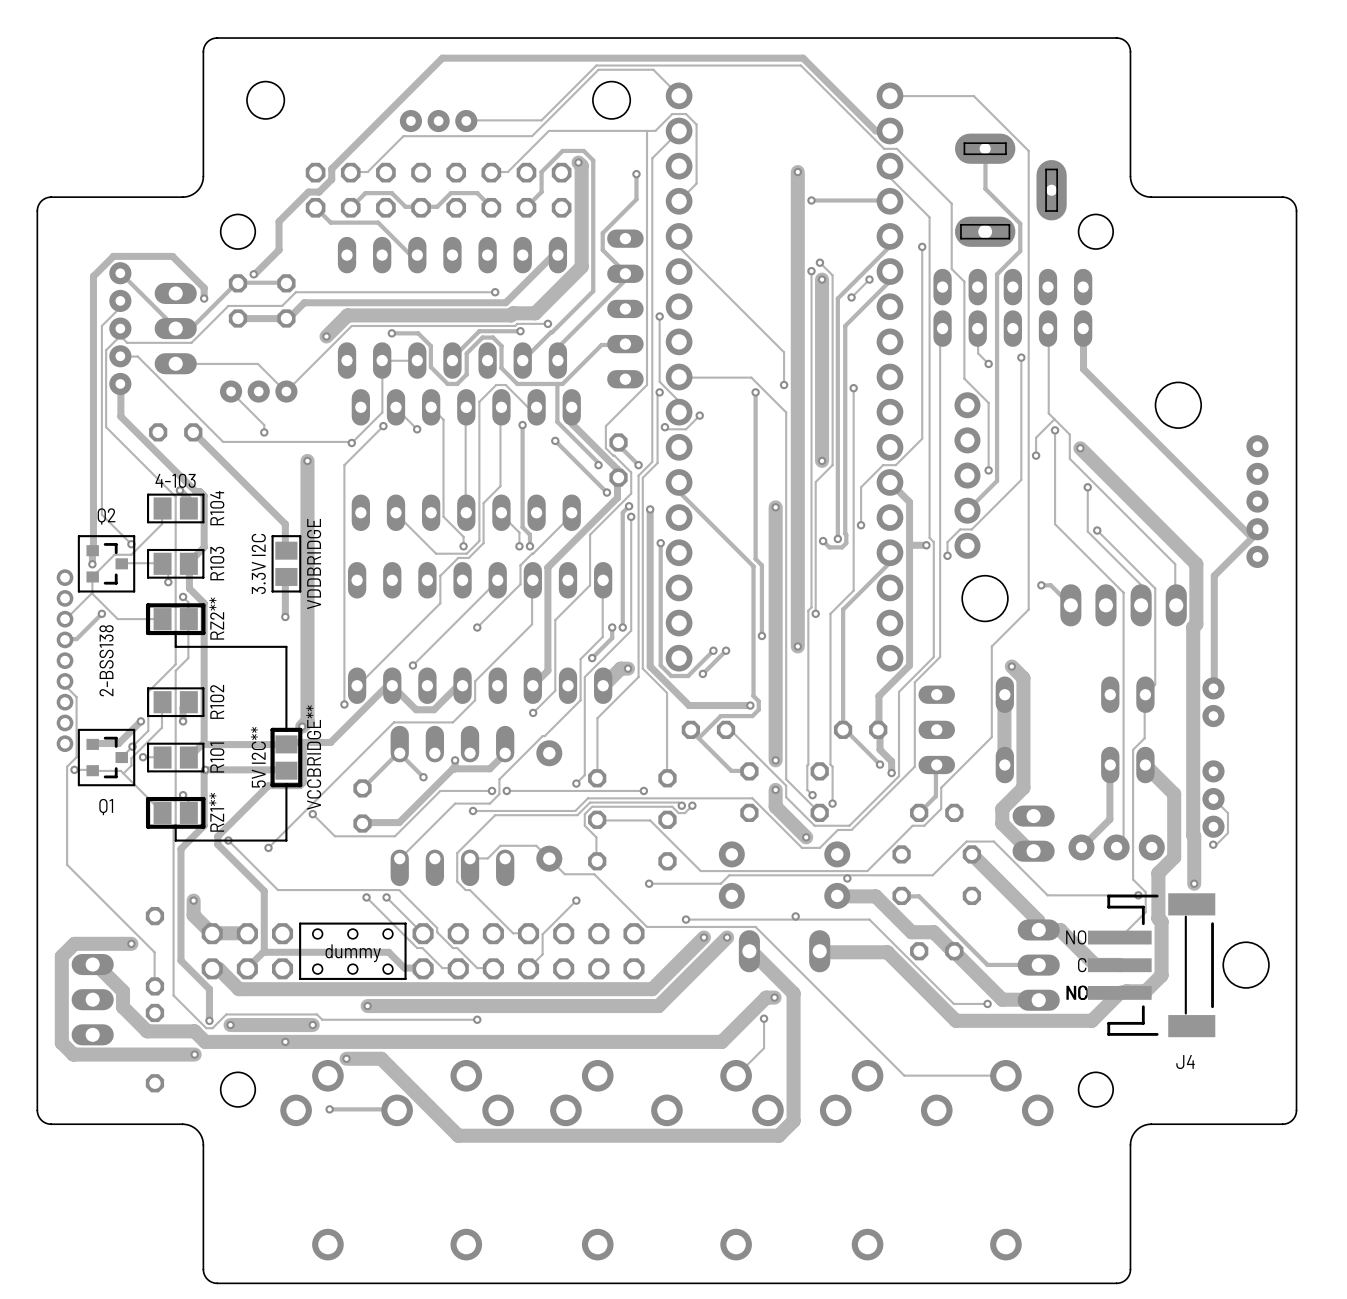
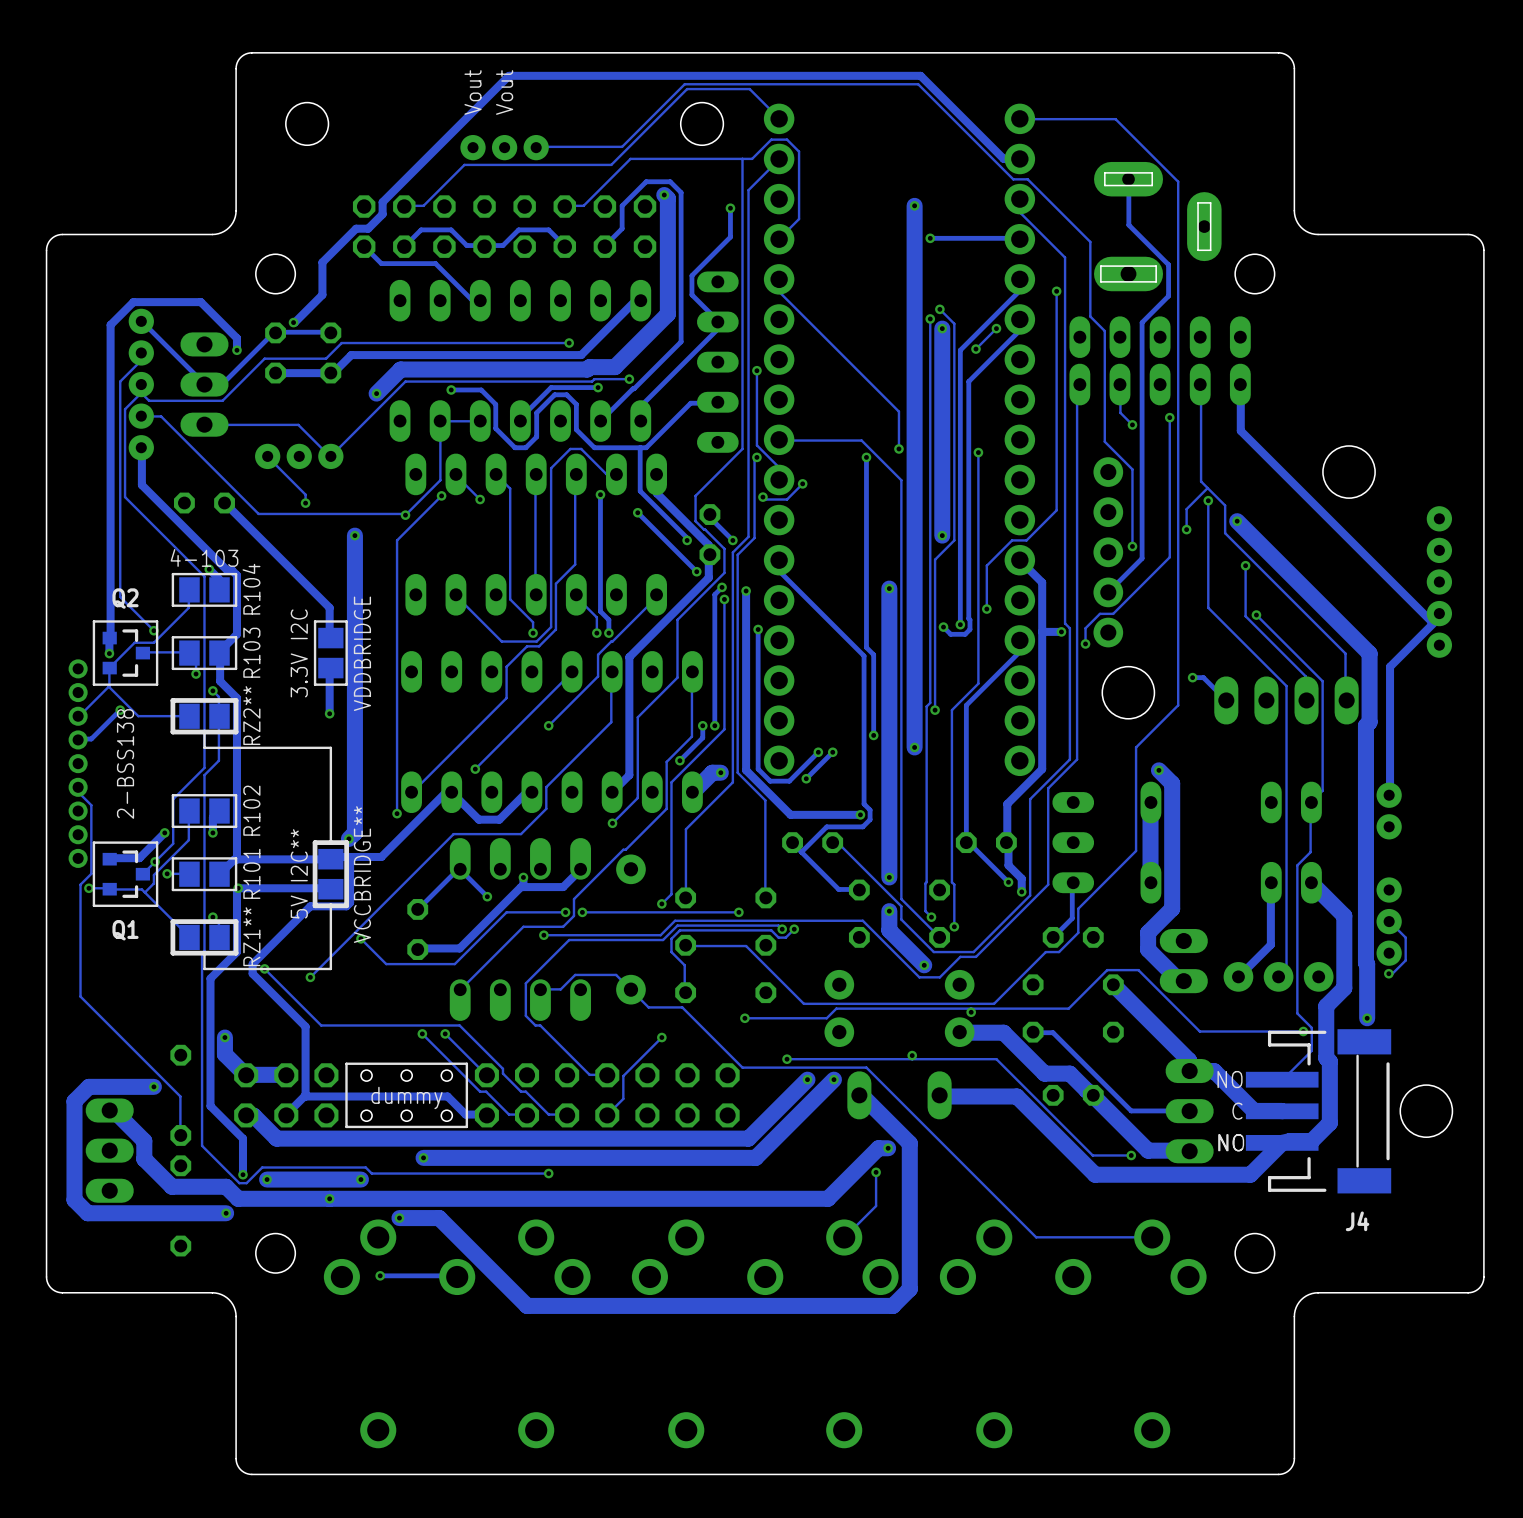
text: none -> Vout (473, 92)
text: none -> Vout (504, 92)

